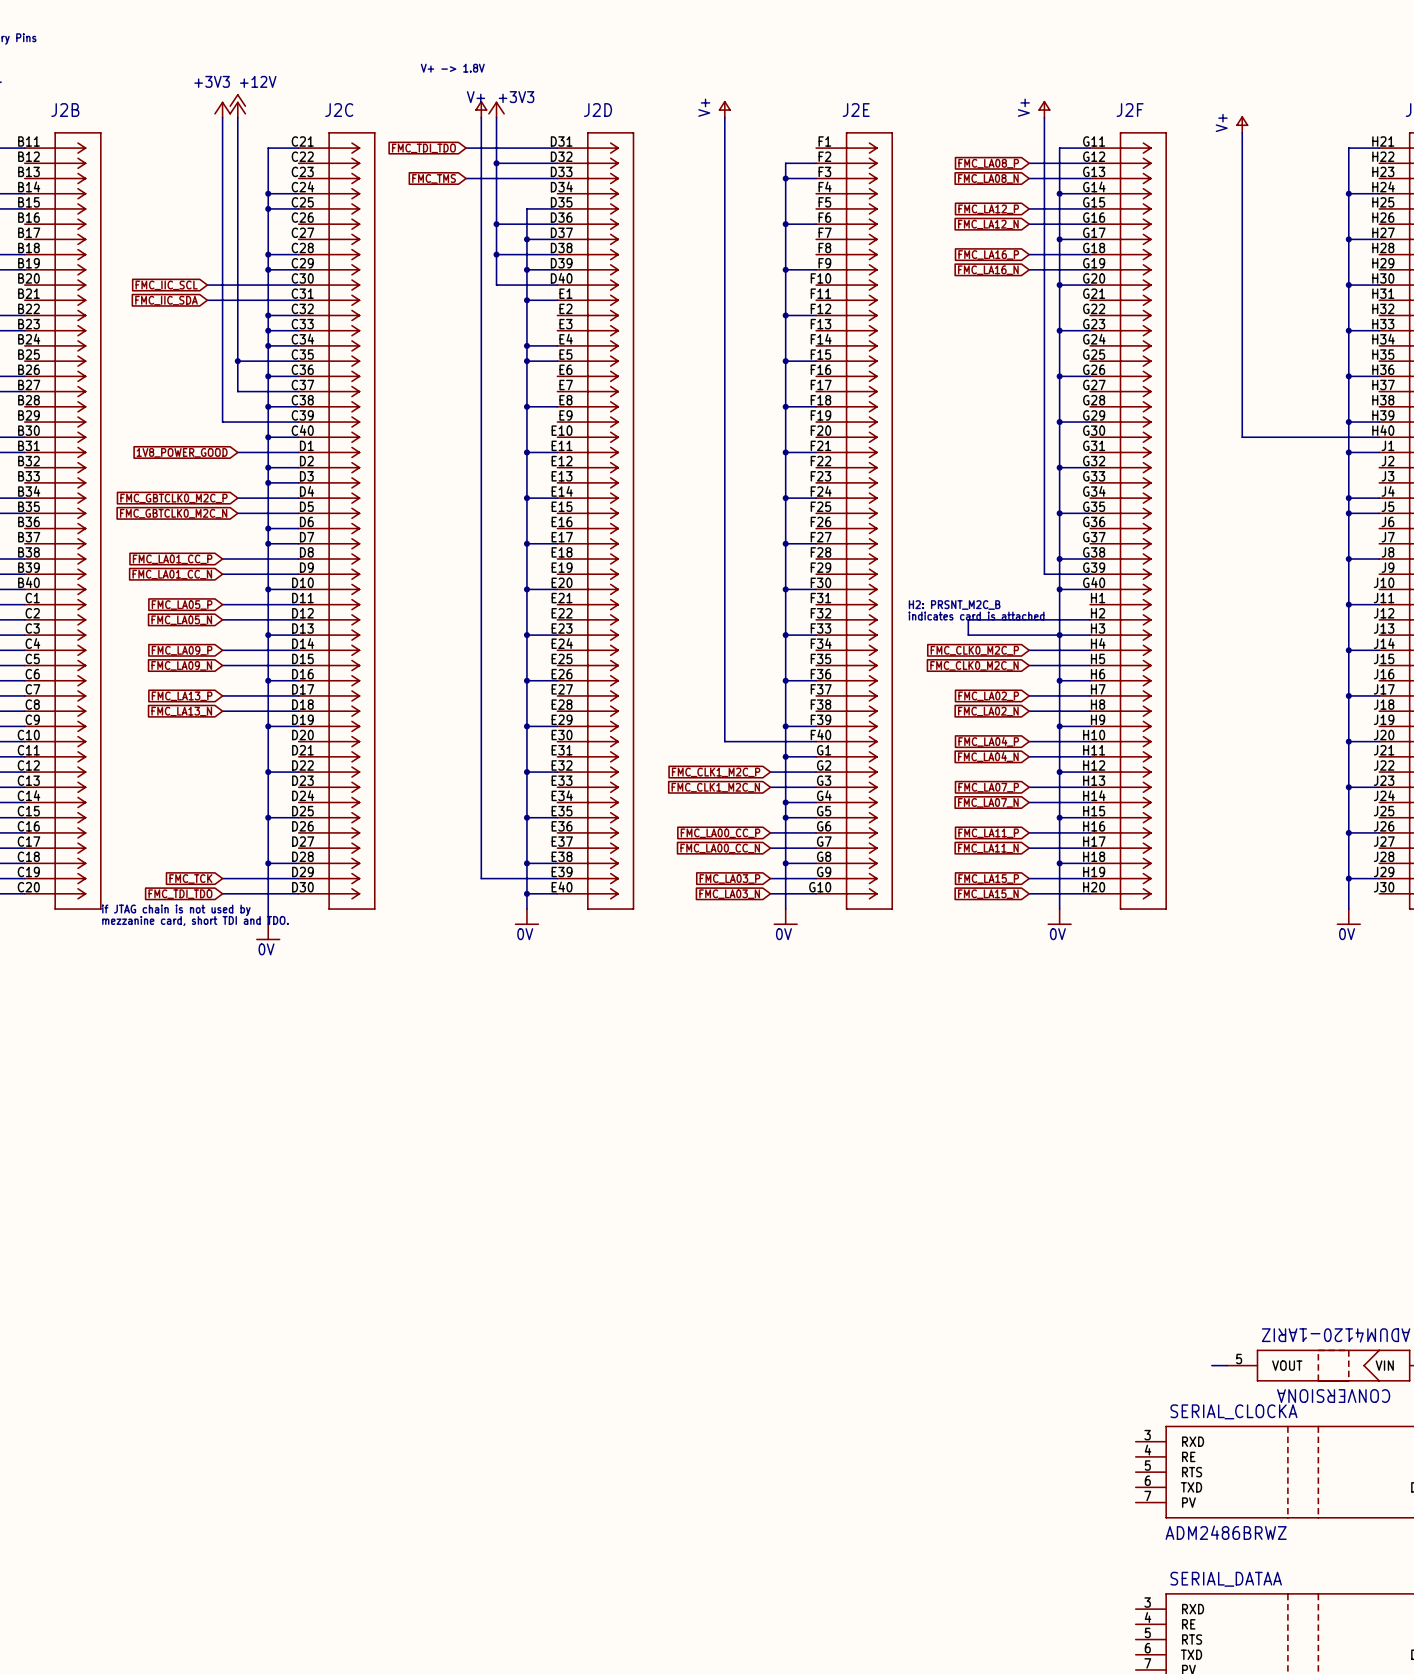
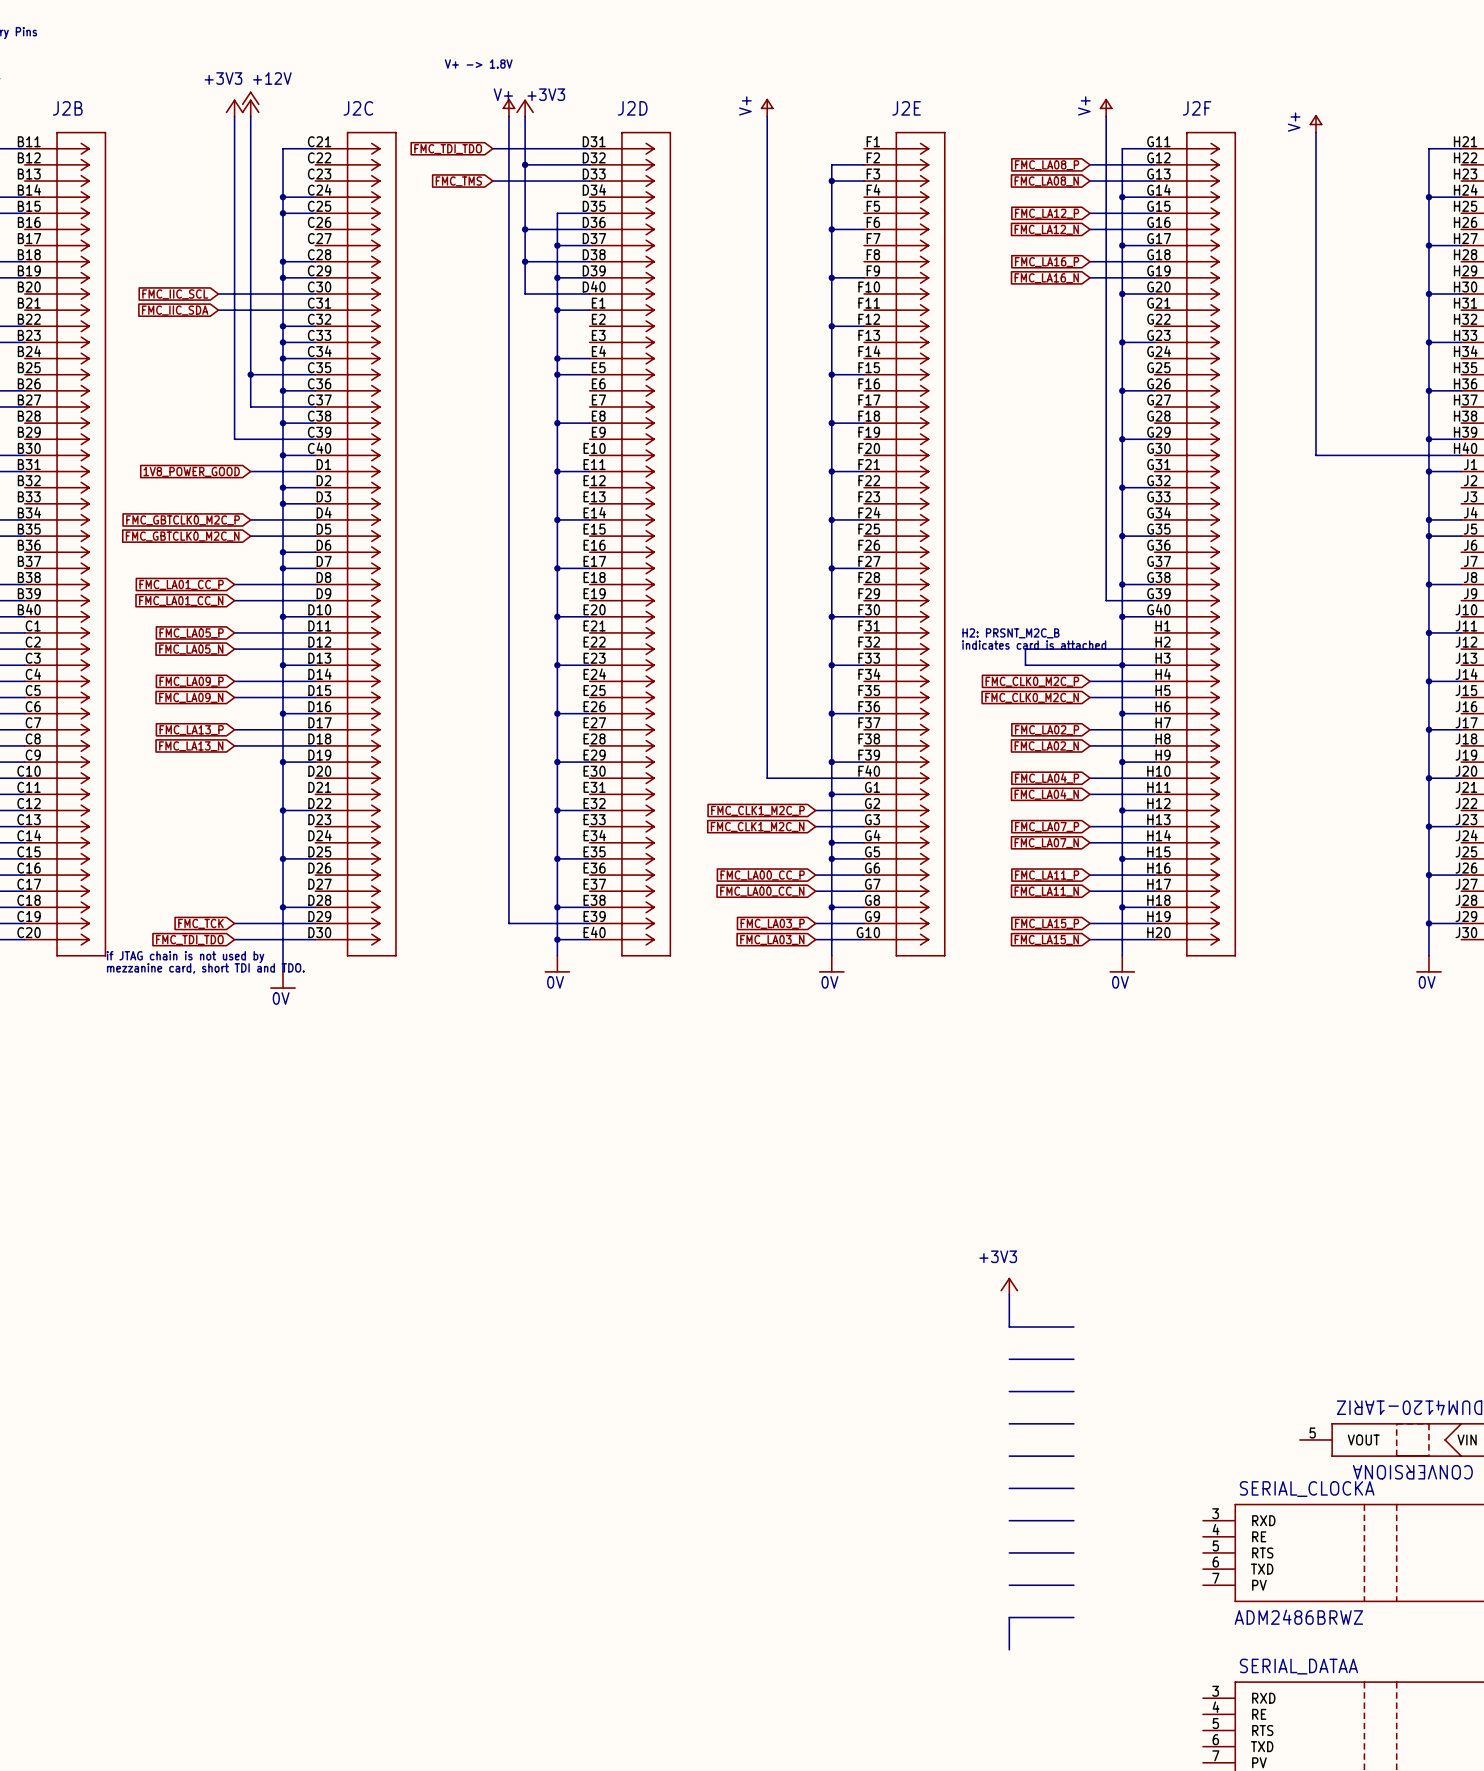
power symbol: none -> +3V3 (1009, 1286)
wire: none -> (1009, 1294) (1009, 1327) (1073, 1327)
wire: none -> (1009, 1359) (1073, 1359)
wire: none -> (1009, 1391) (1073, 1391)
wire: none -> (1009, 1423) (1073, 1423)
wire: (1211, 1365) (1227, 1365) -> none
wire: none -> (1009, 1456) (1073, 1456)
wire: none -> (1009, 1488) (1073, 1488)
wire: none -> (1009, 1520) (1073, 1520)
wire: none -> (1009, 1552) (1073, 1552)
wire: none -> (1009, 1585) (1073, 1585)
wire: none -> (1073, 1617) (1009, 1617) (1009, 1649)

